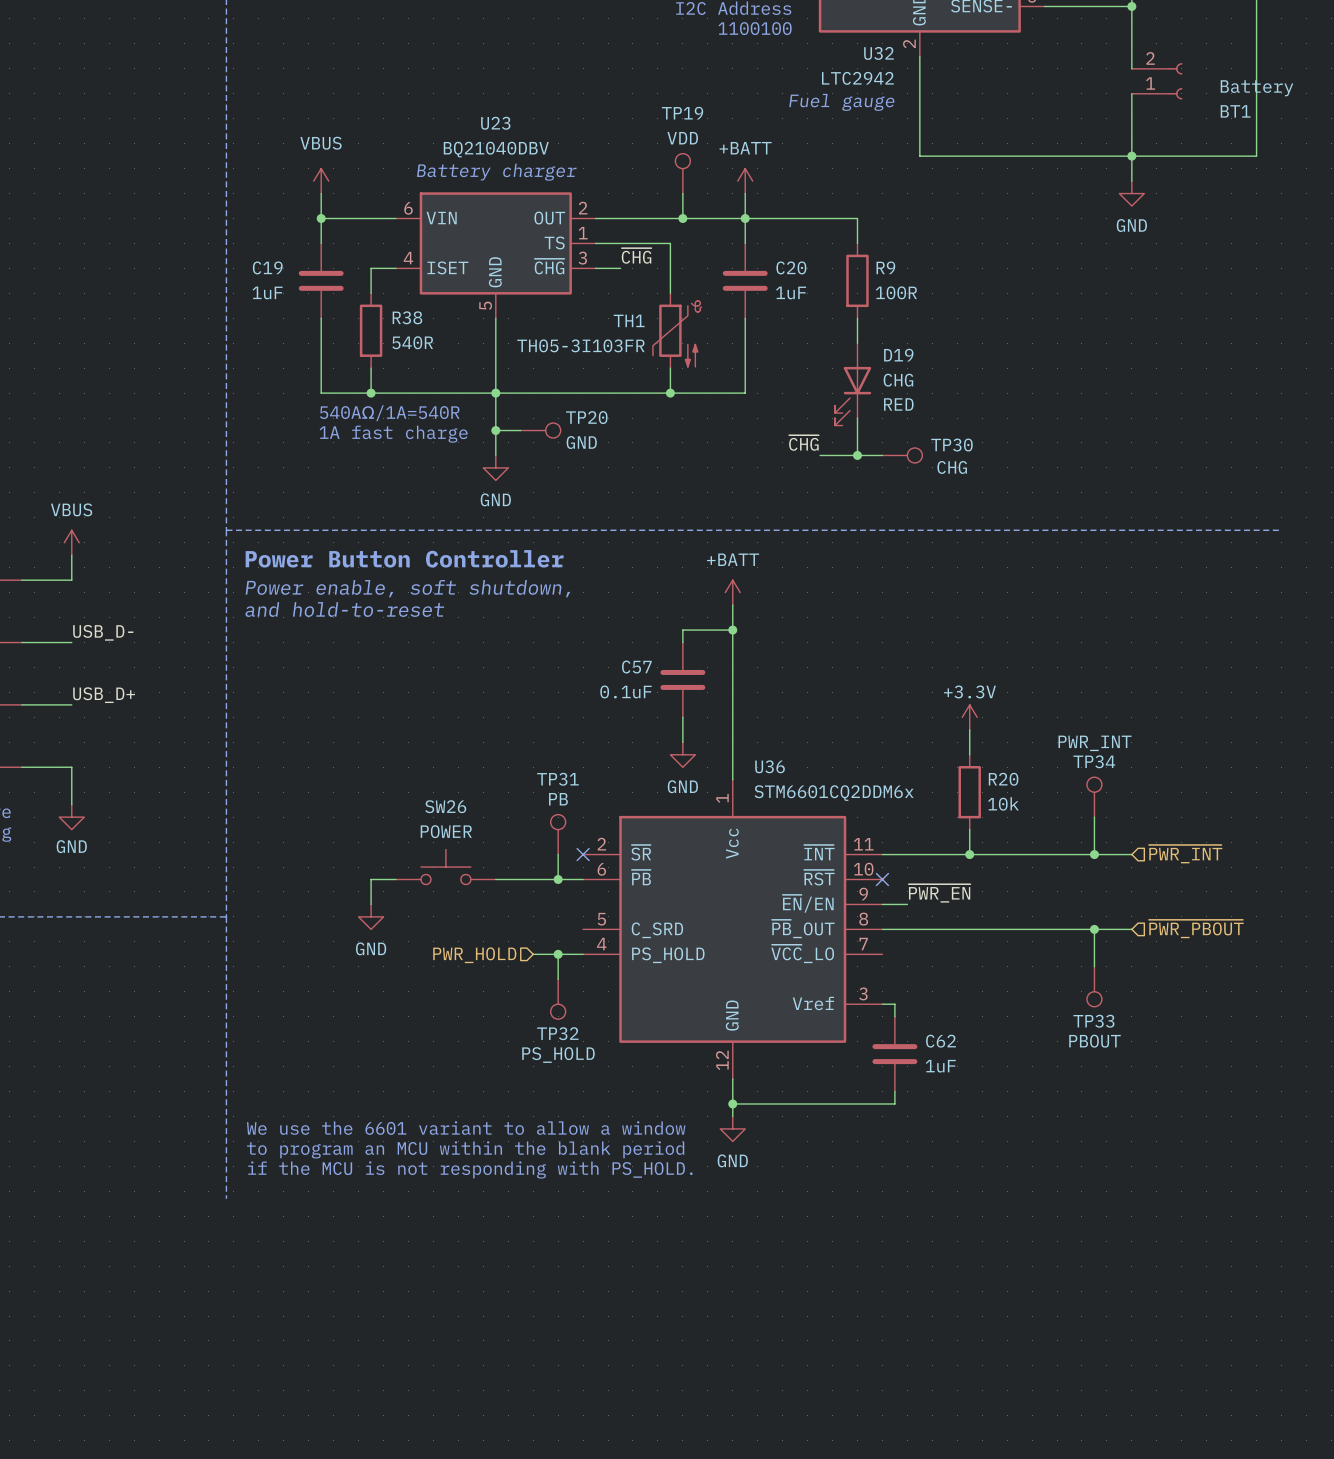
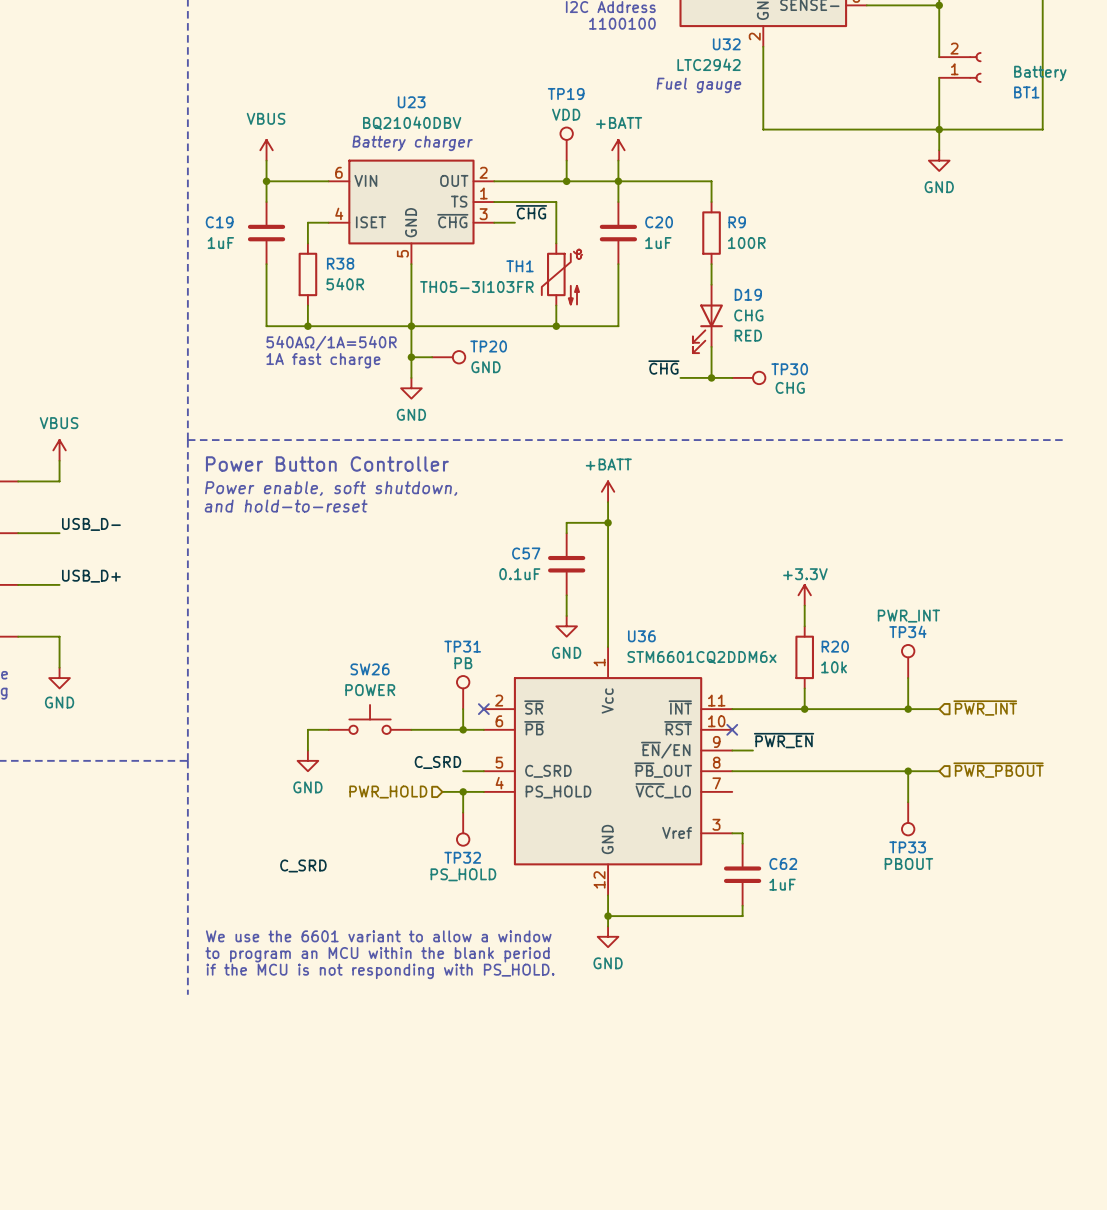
label: none -> C_SRD (437, 762)
wire: none -> (463, 771) (483, 771)
label: none -> C_SRD (303, 865)

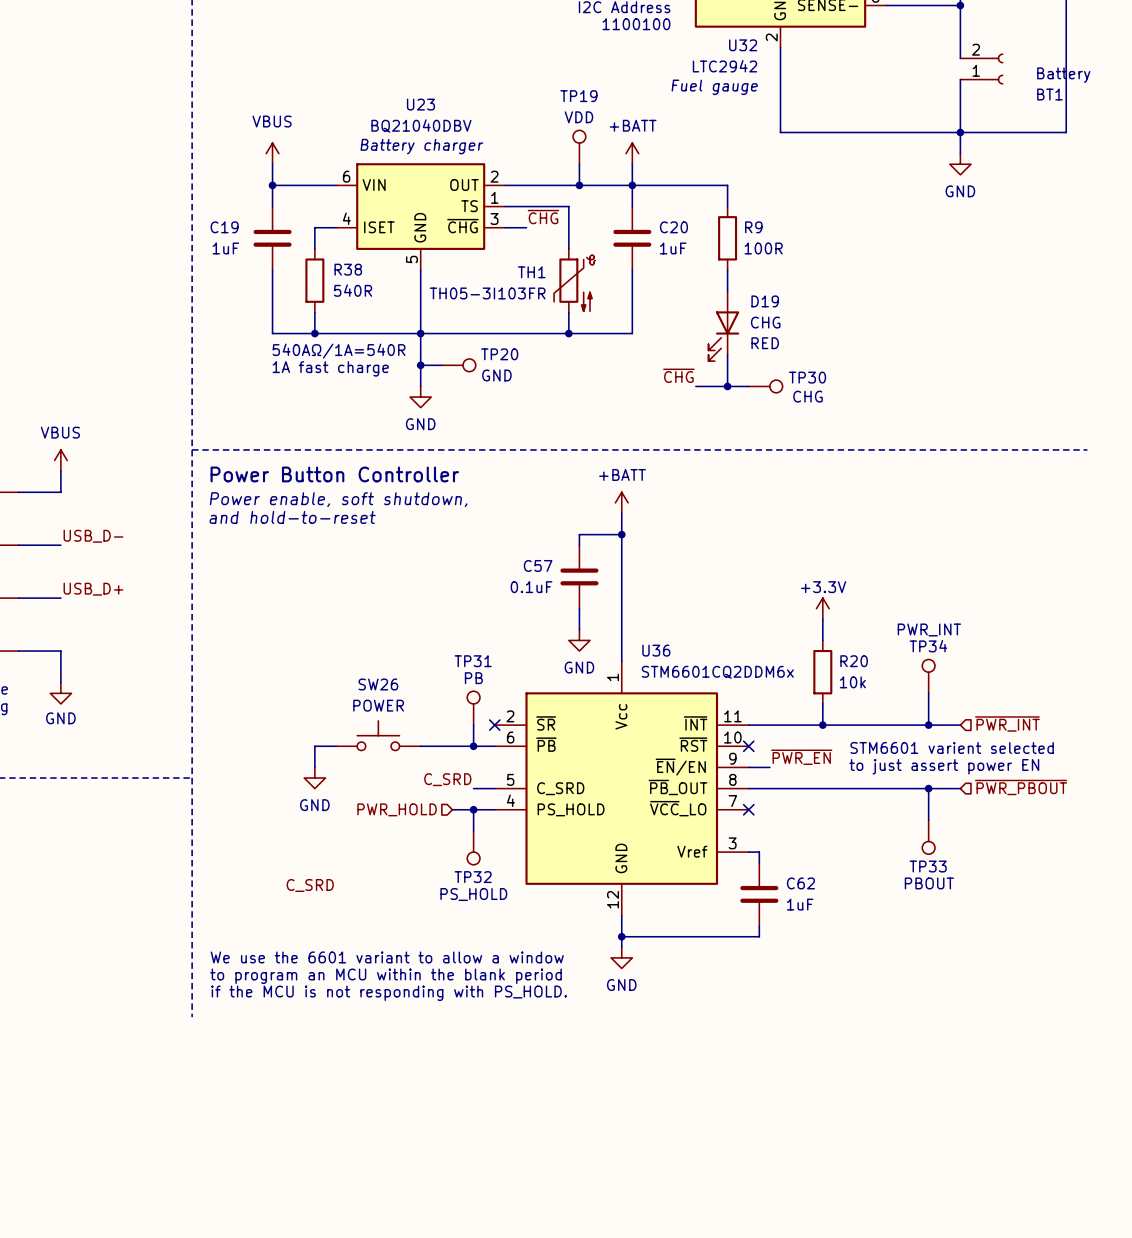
text: none -> STM6601 varient selected (952, 747)
text: none -> to just assert power EN (944, 766)
no-connect mark: none -> (748, 809)

